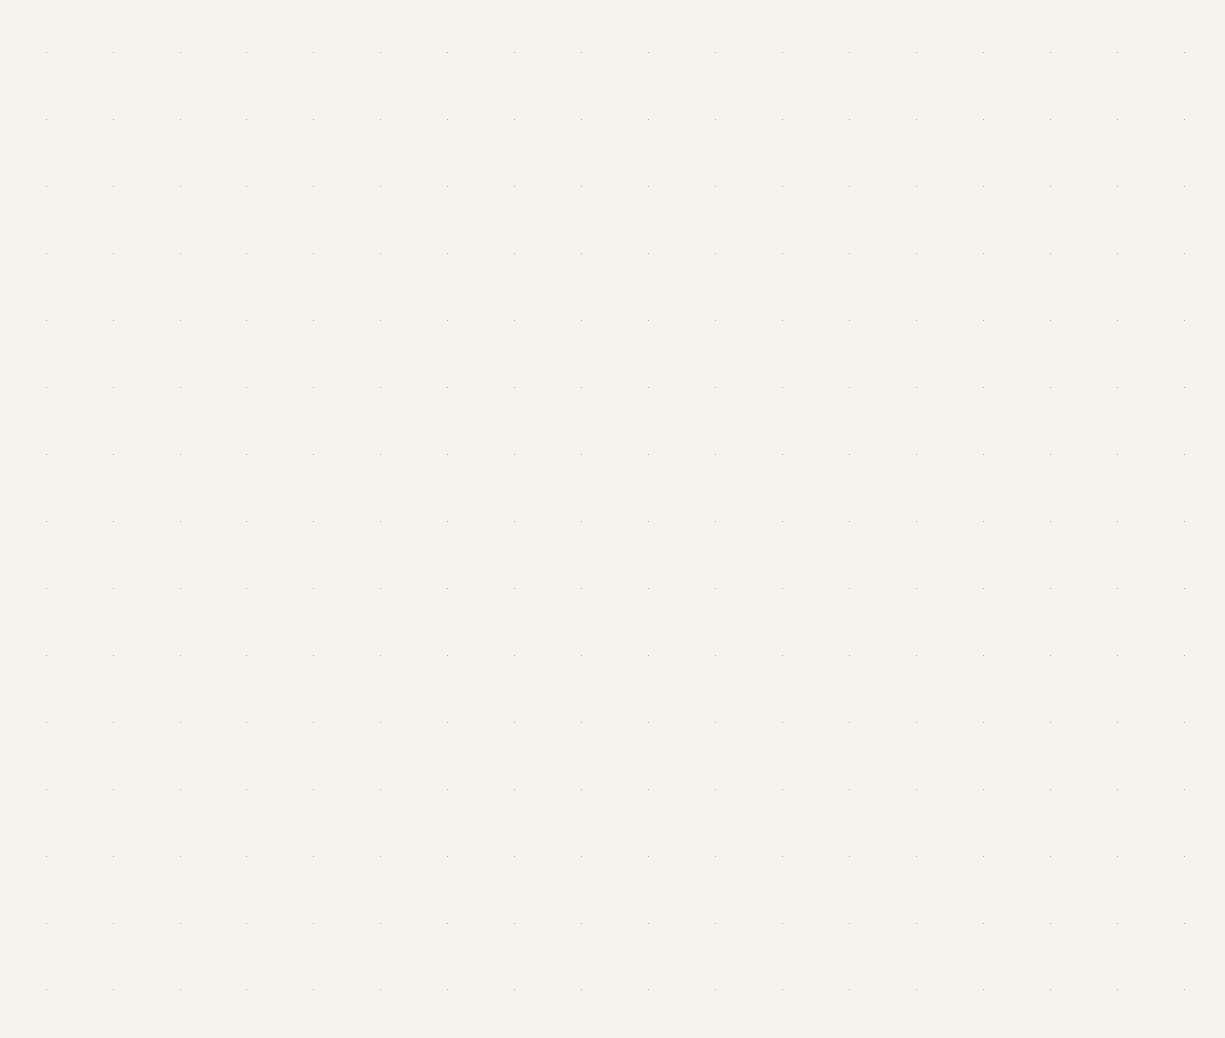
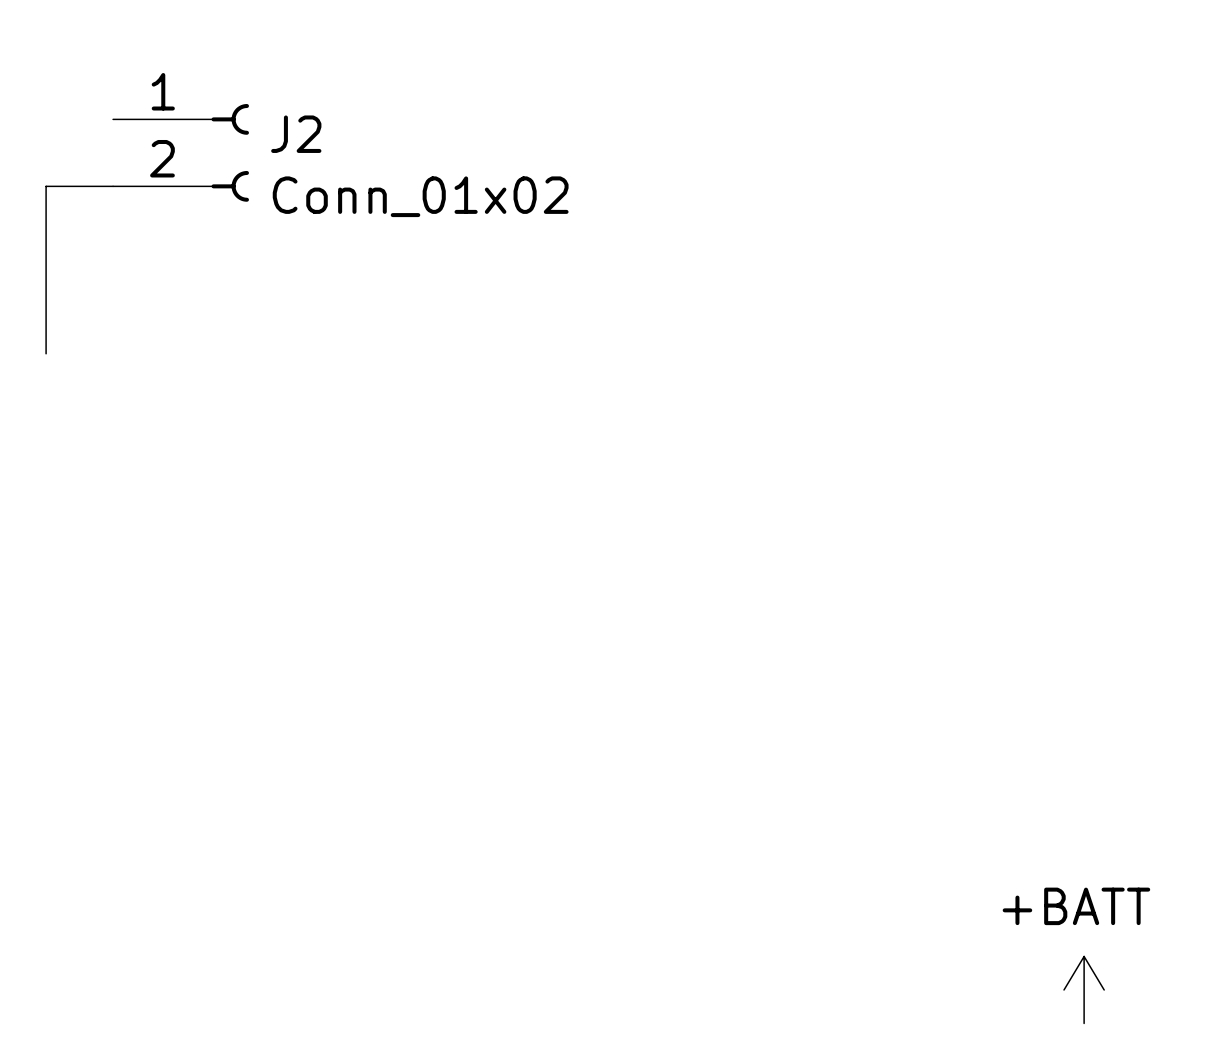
J2: none -> Conn_01x02 (181, 152)
wire: none -> (113, 186) (46, 186) (46, 353)
power symbol: none -> +BATT (1084, 989)

